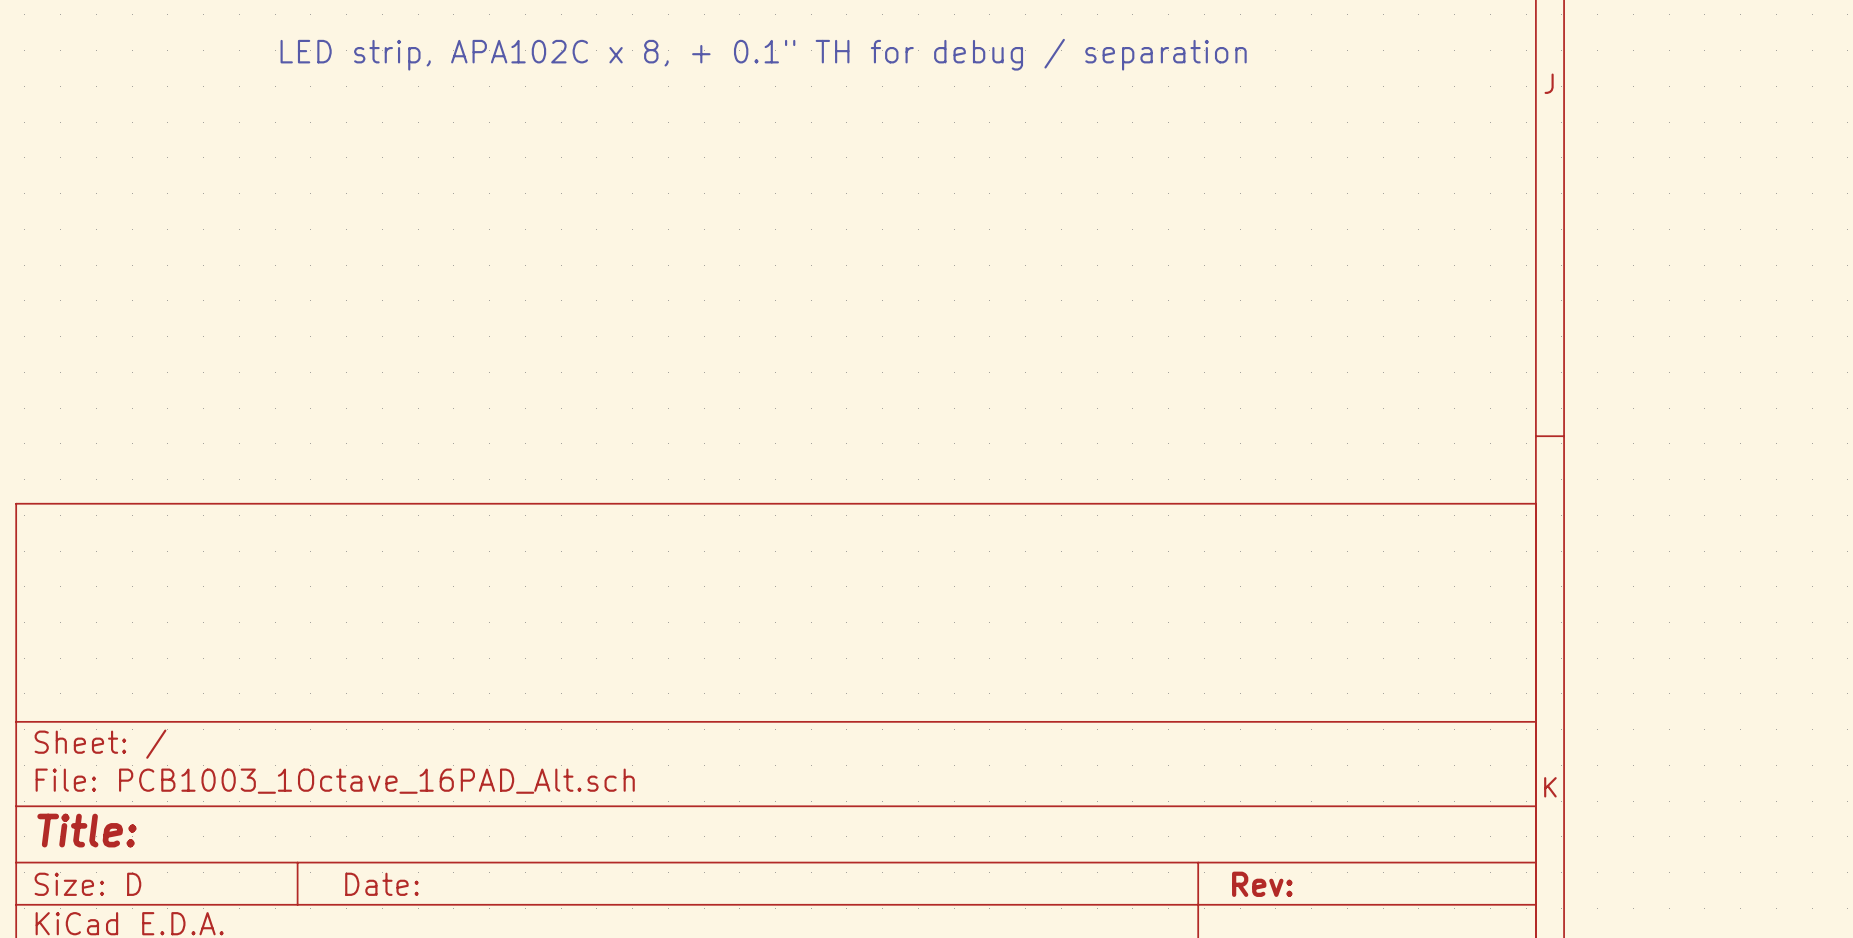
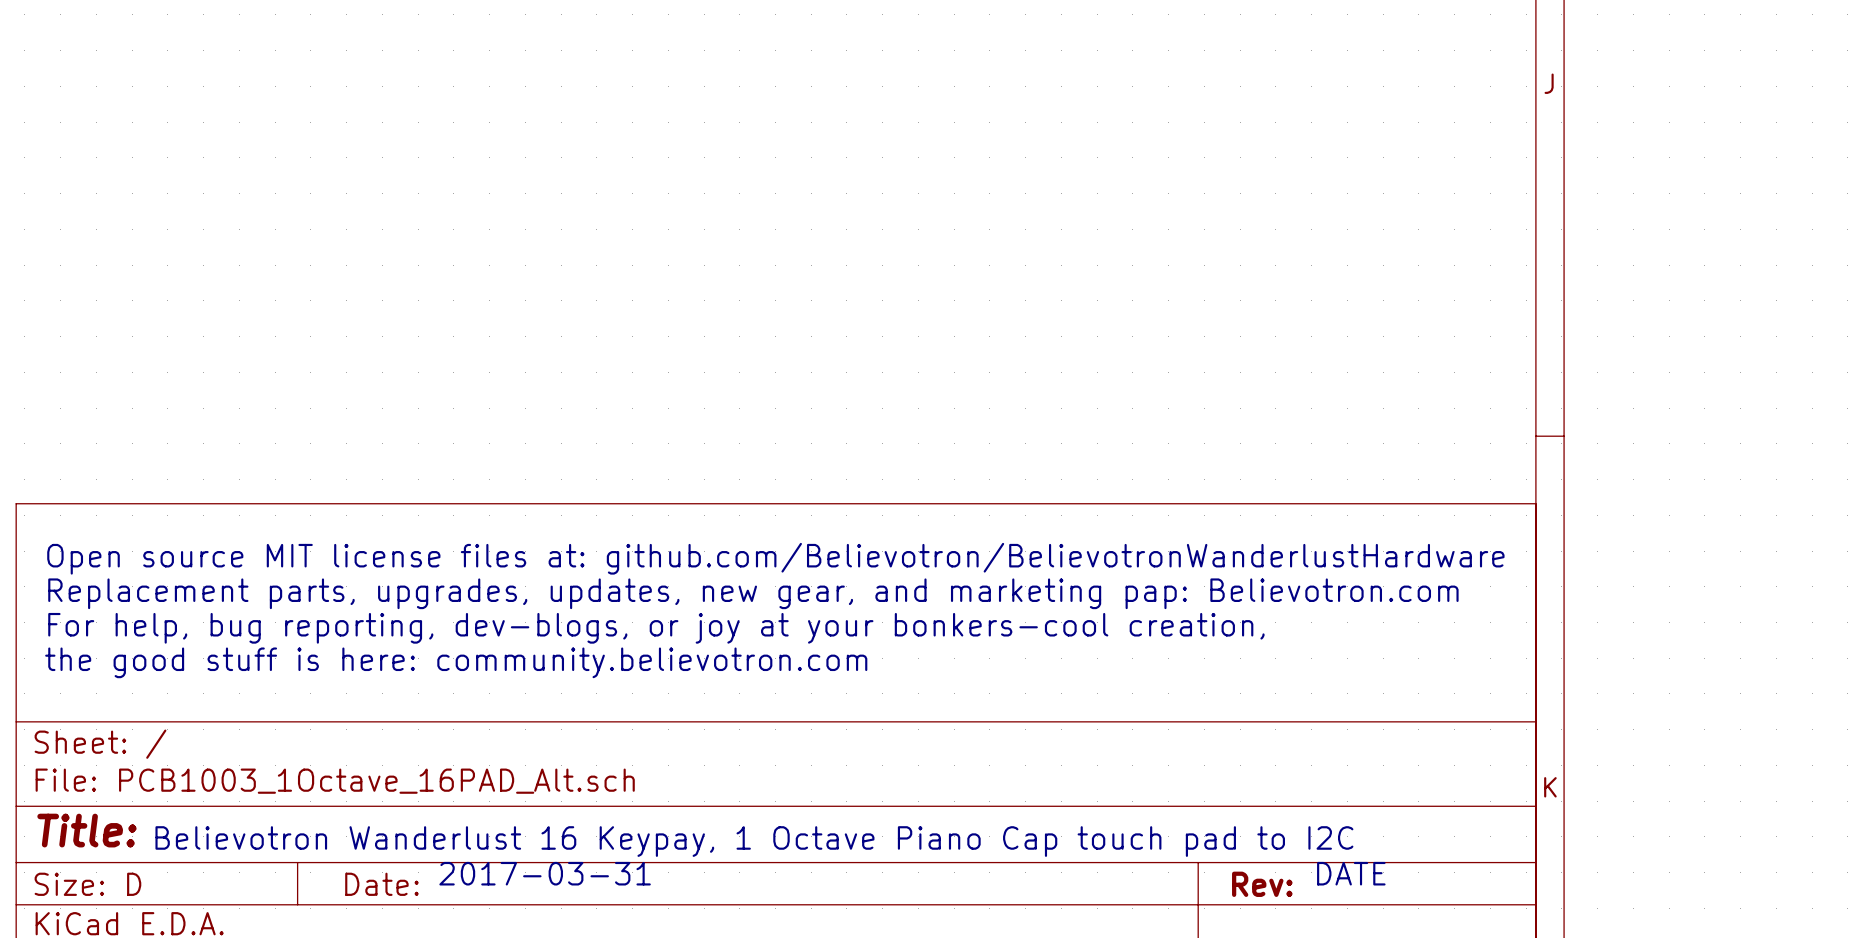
text: LED strip, APA102C x 8, + 0.1" TH for debug / separation (763, 54) -> none
text: none -> Open source MIT license files at: github.com/Believotron/BelievotronWanderlustHardware (775, 558)
text: none -> Replacement parts, upgrades, updates, new gear, and marketing pap: Believotron.com (753, 593)
text: none -> For help, bug reporting, dev-blogs, or joy at your bonkers-cool creation, (656, 628)
text: none -> the good stuff is here: community.believotron.com (456, 662)
text: none -> Believotron Wanderlust 16 Keypay, 1 Octave Piano Cap touch pad to I2C (754, 841)
text: none -> 2017-03-31 (545, 873)
text: none -> DATE (1351, 873)

